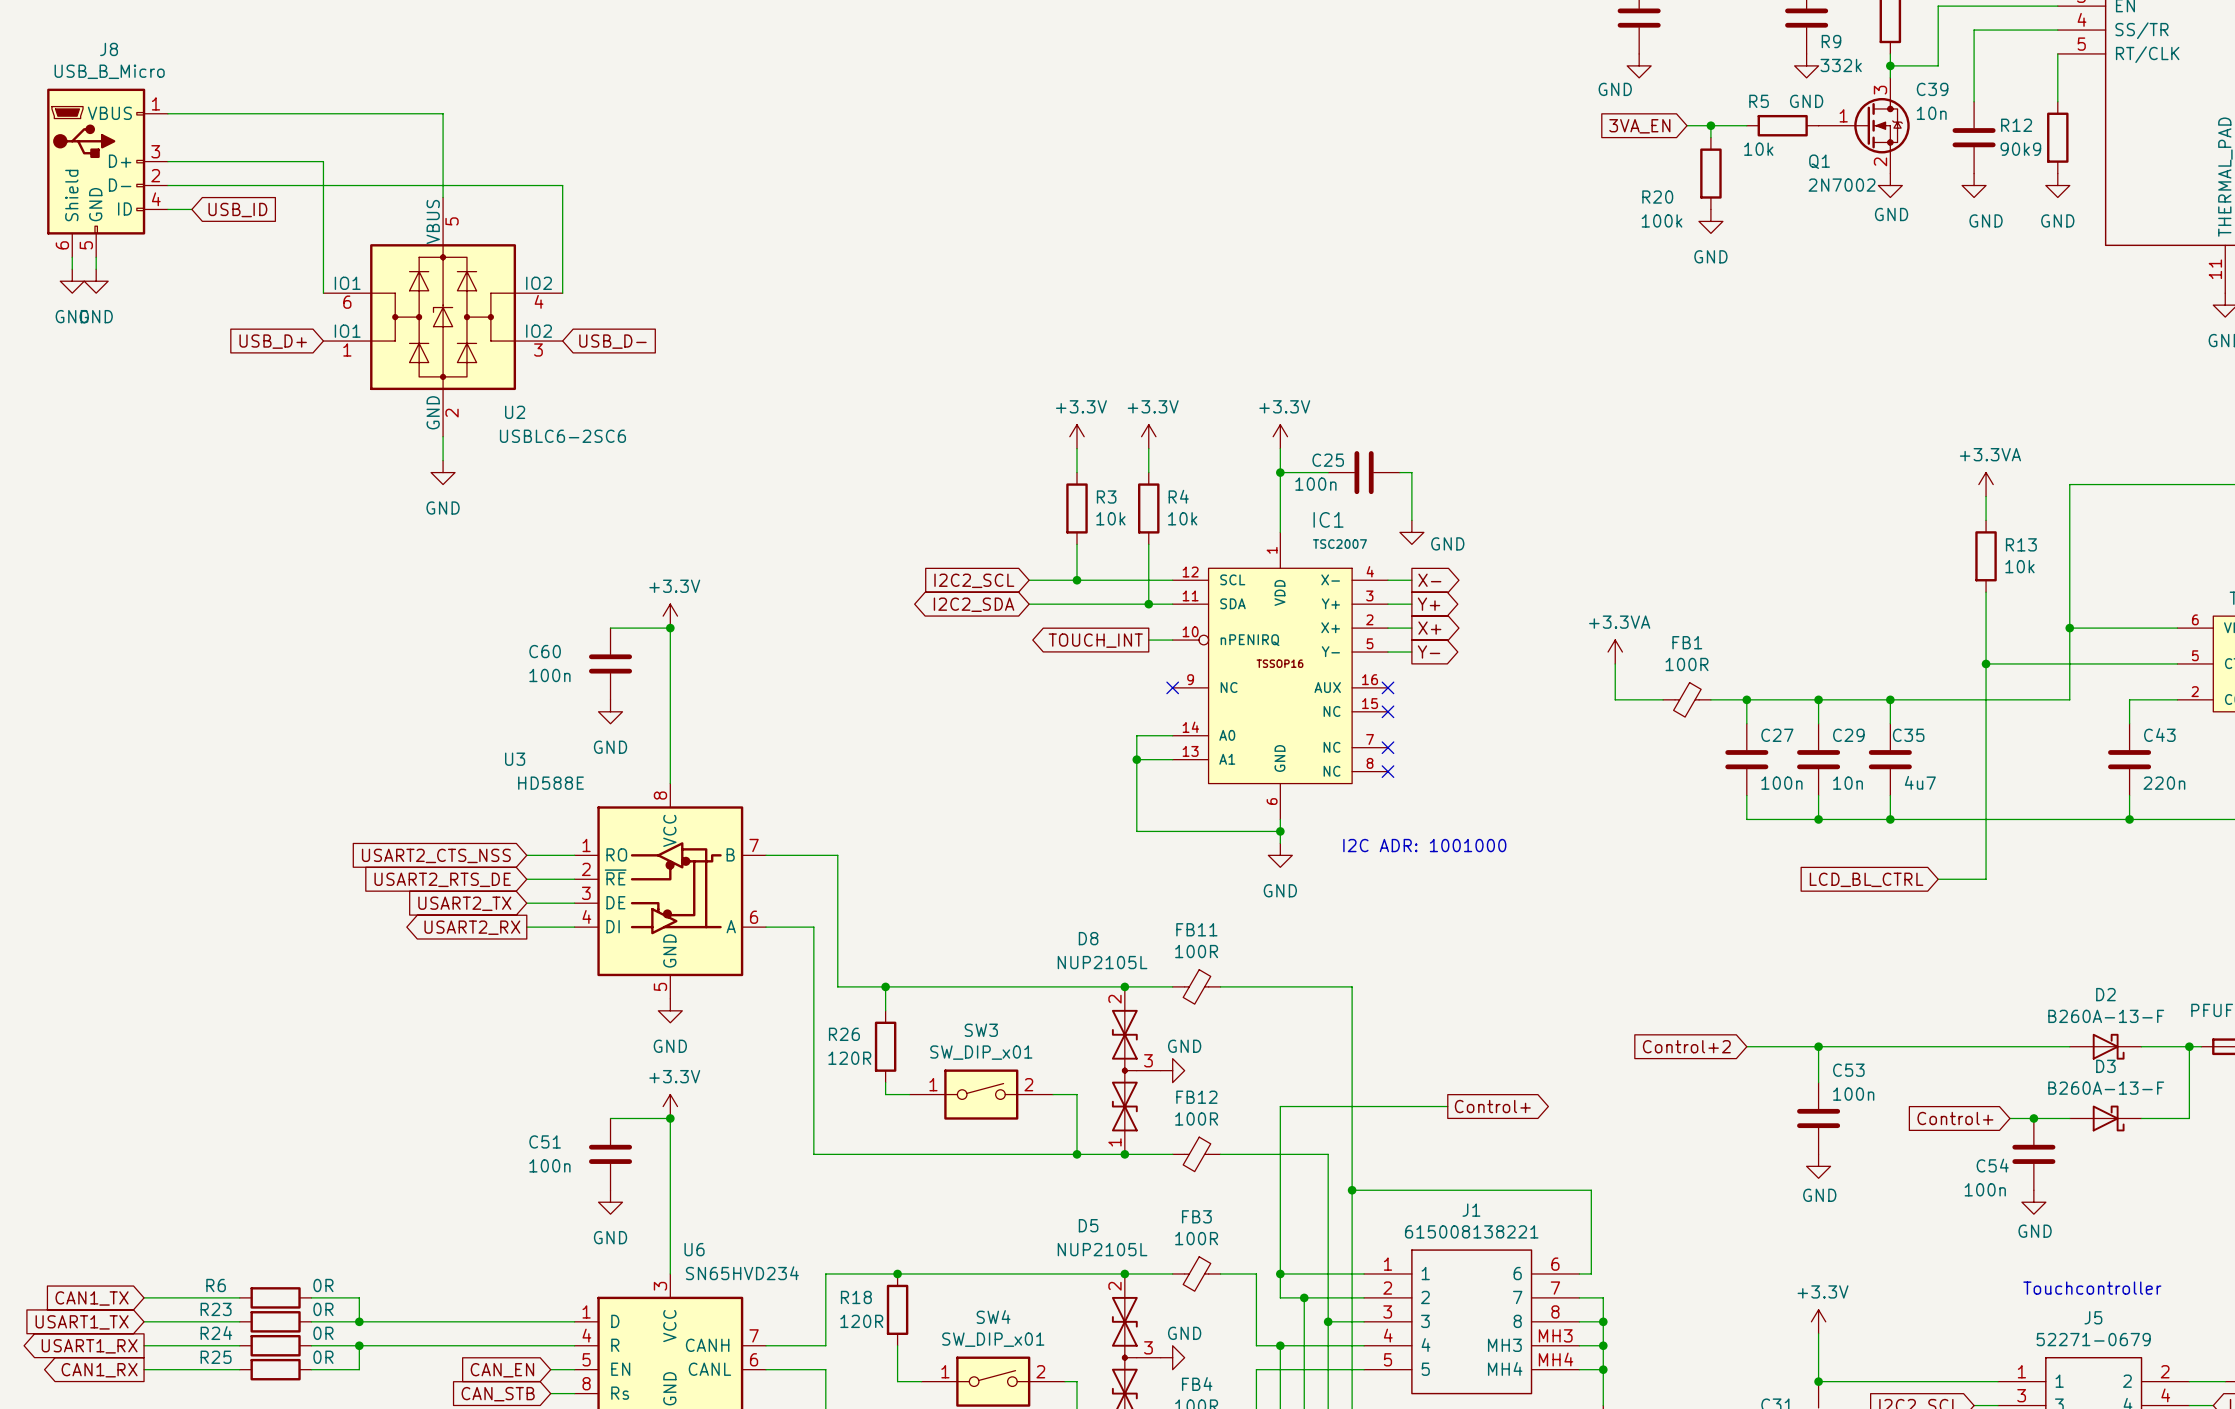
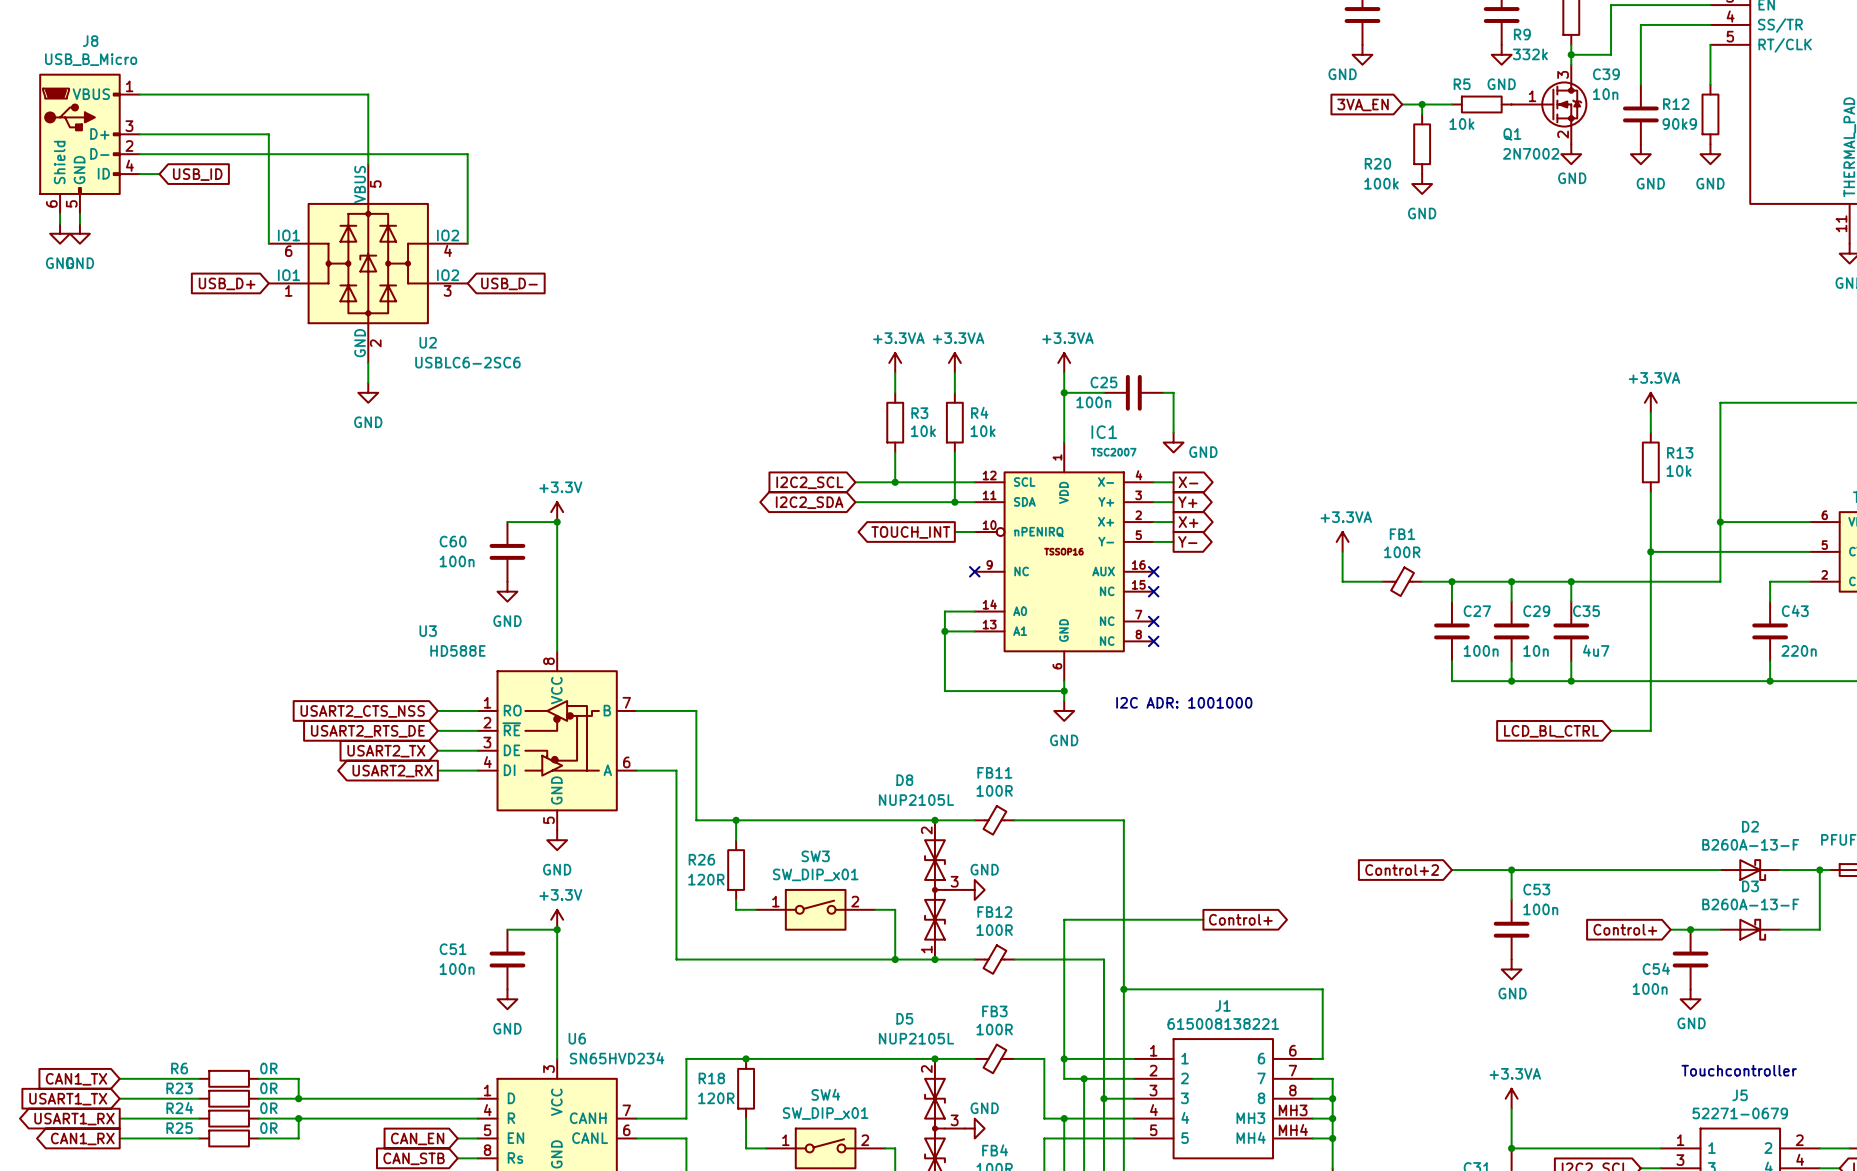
power symbol: +3.3V (1076, 436) -> +3.3VA (895, 362)
power symbol: +3.3V (1148, 436) -> +3.3VA (954, 362)
power symbol: +3.3V (1280, 436) -> +3.3VA (1064, 362)
power symbol: +3.3V (1818, 1321) -> +3.3VA (1511, 1098)

